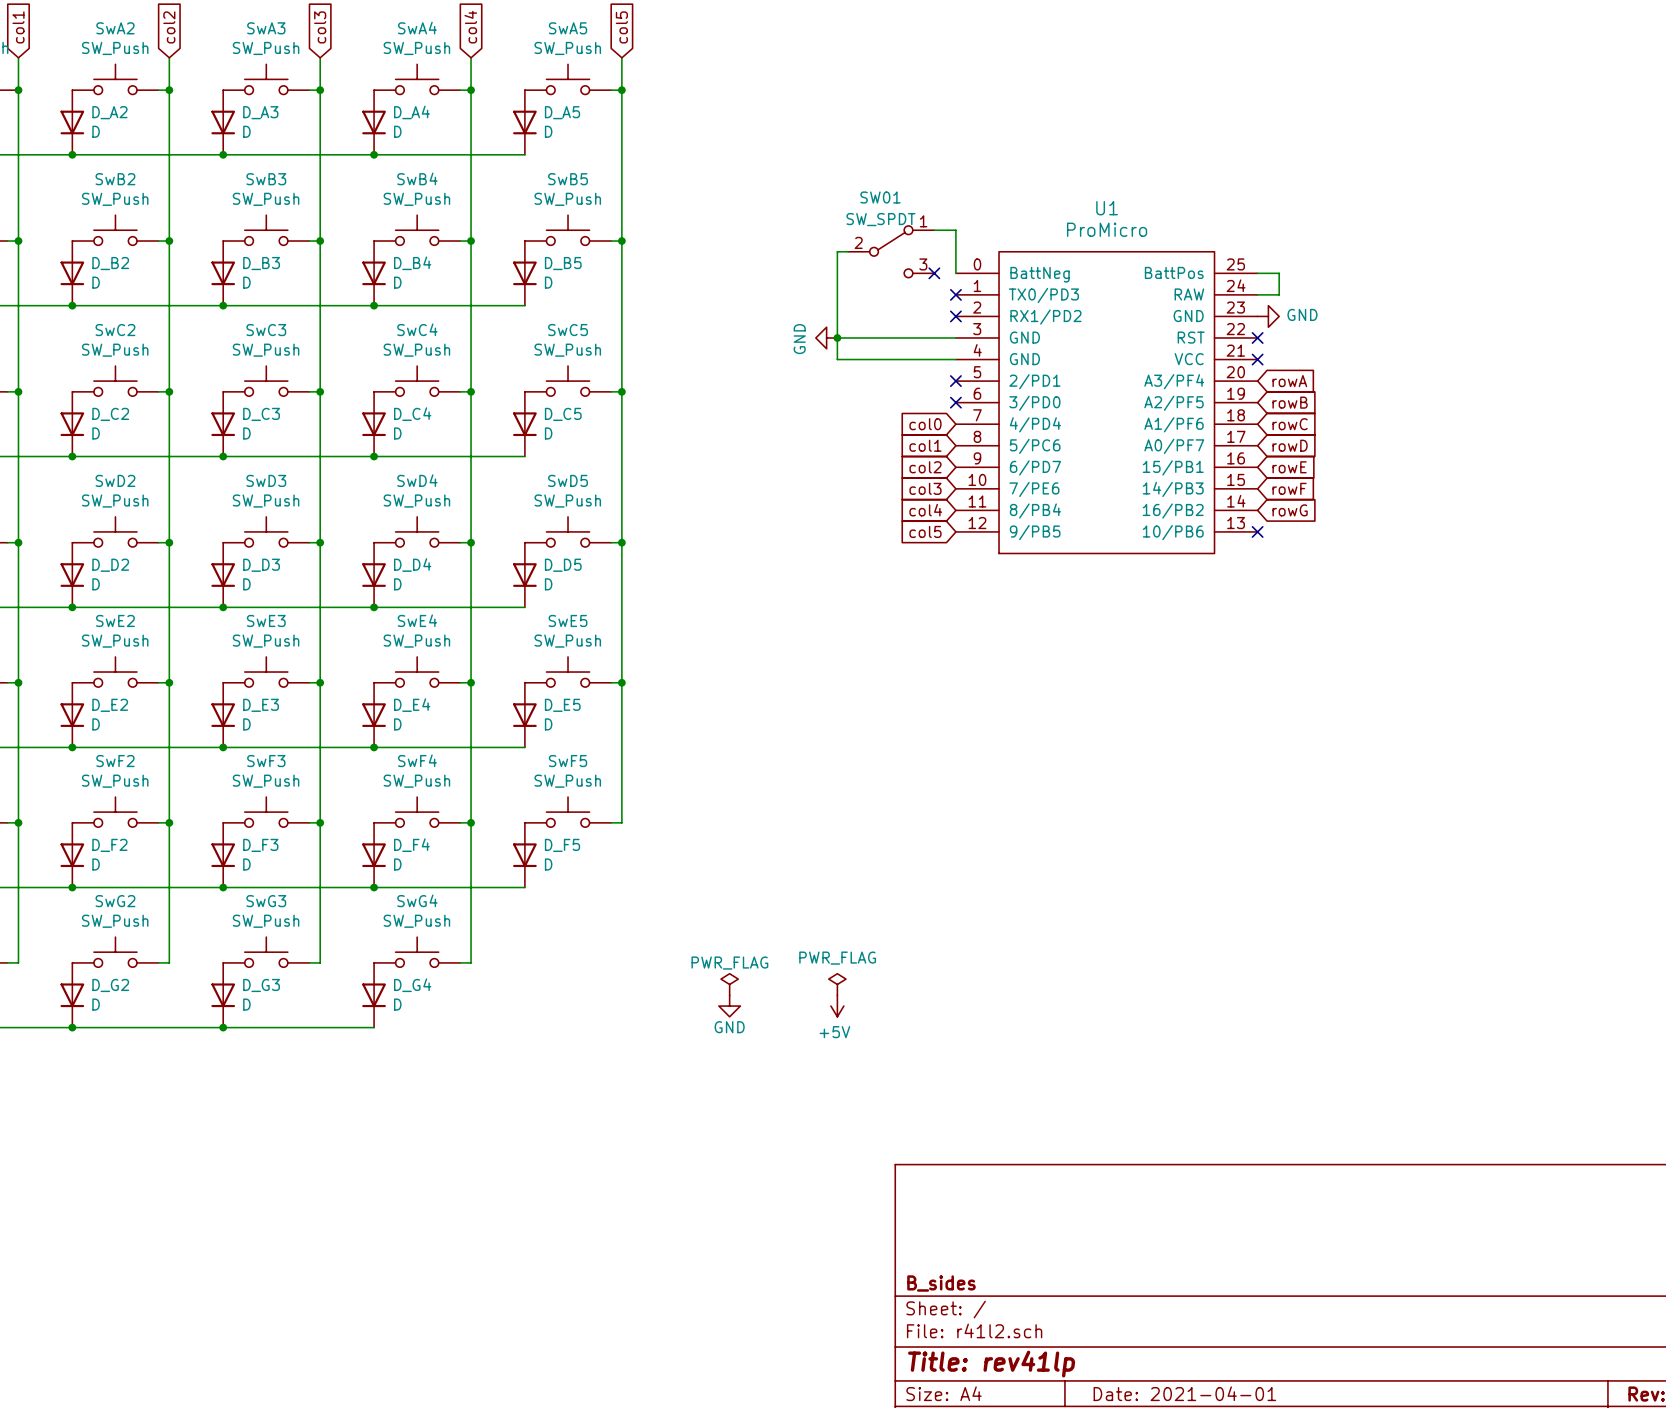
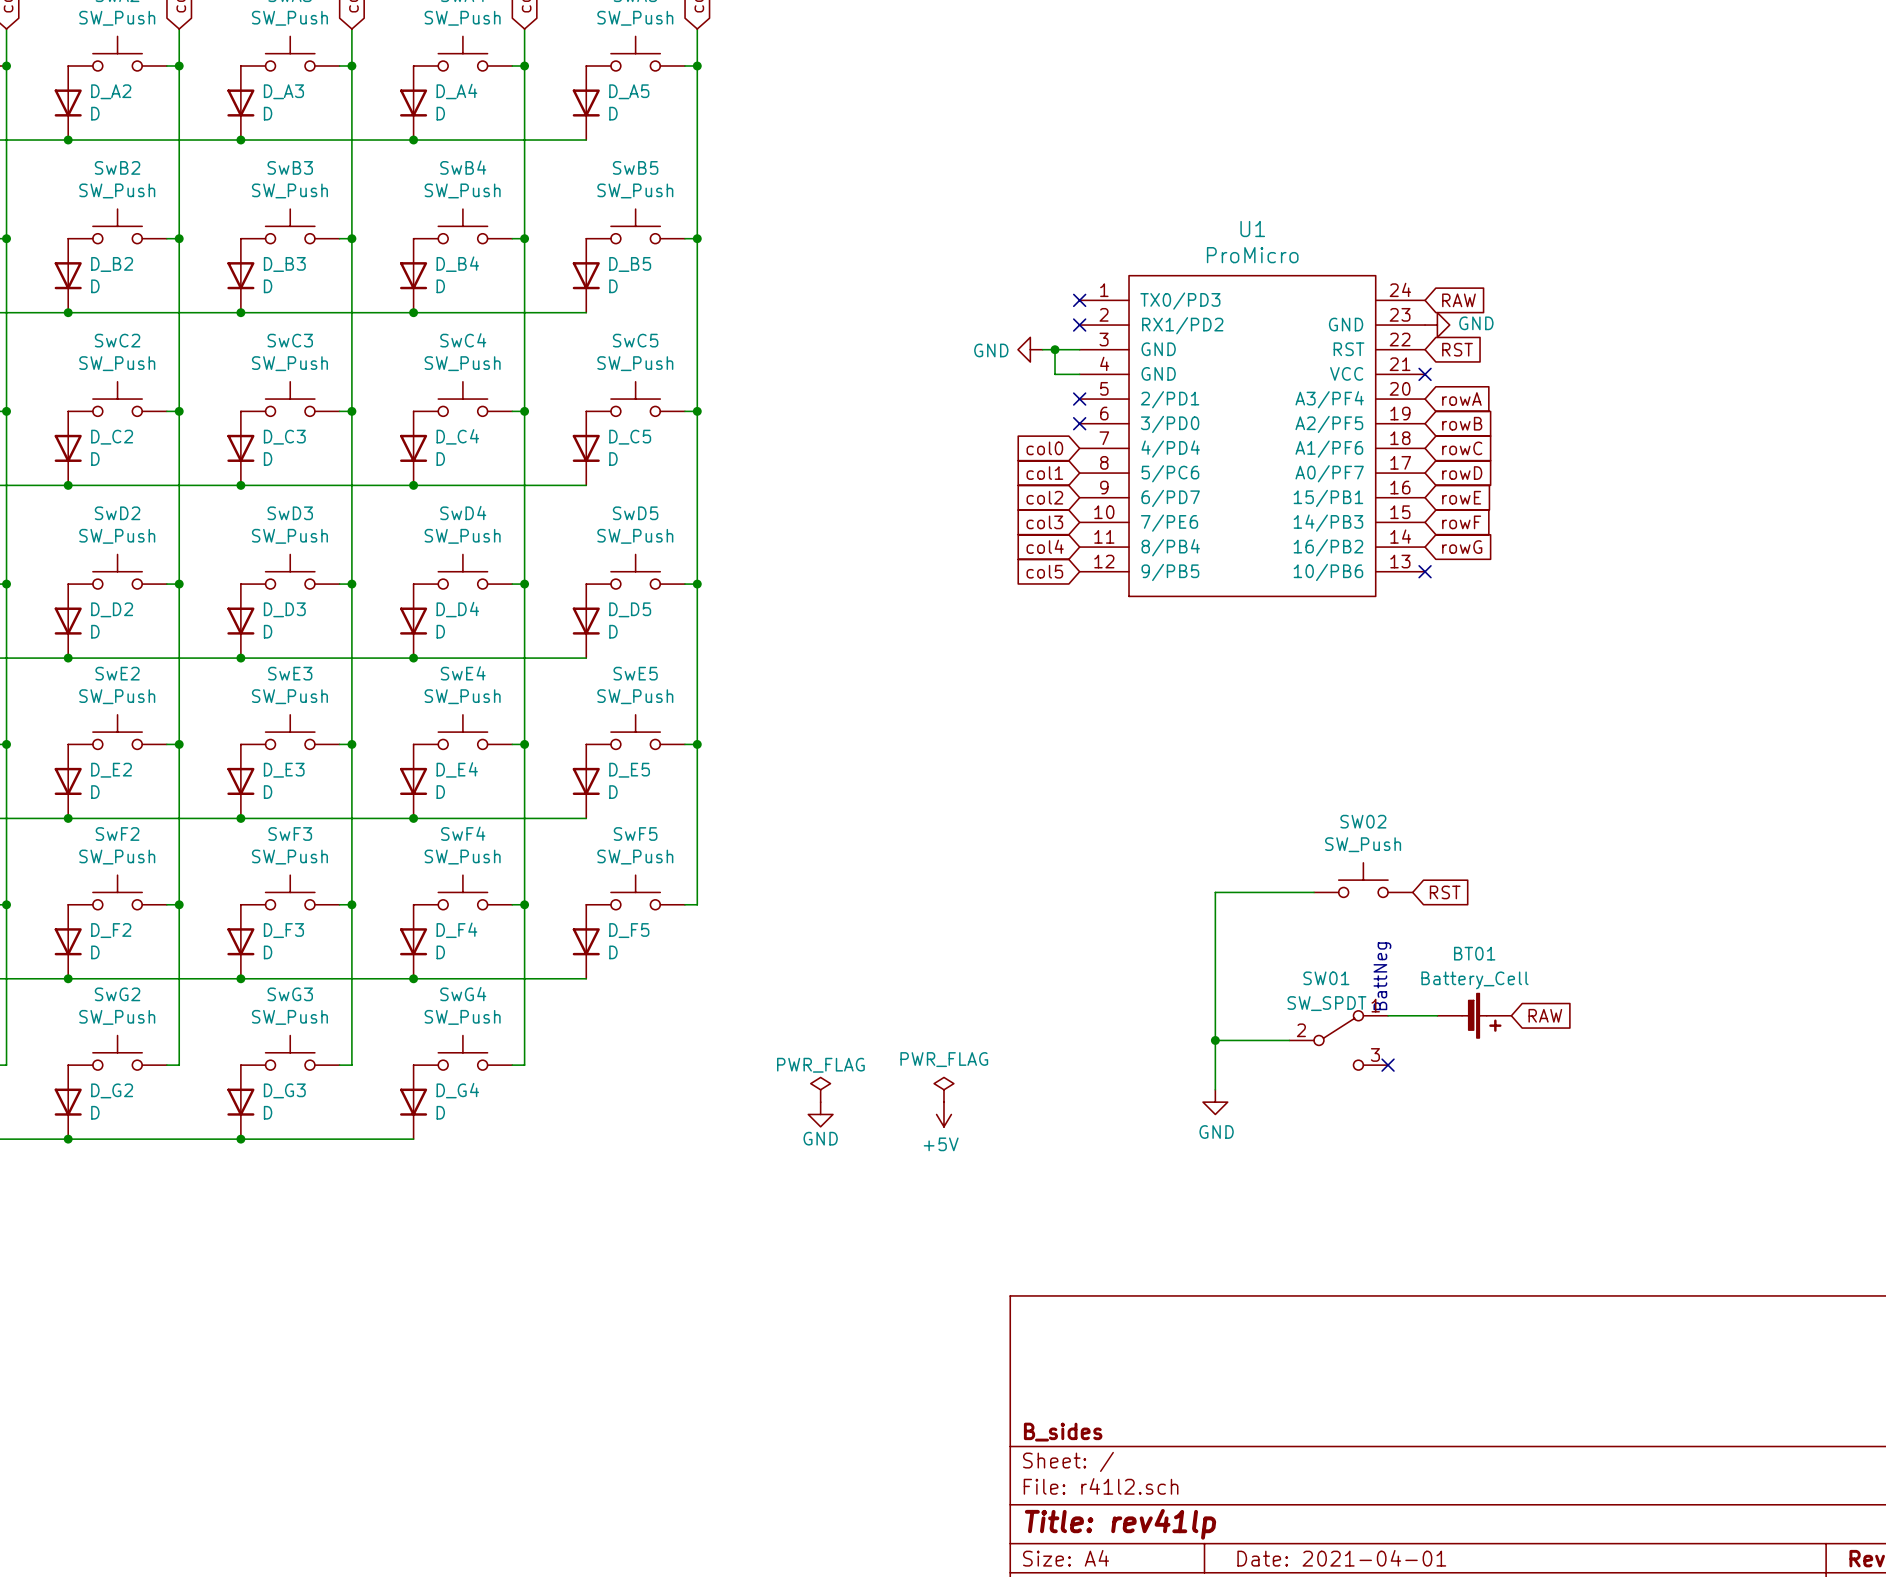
wire: (934, 230) (955, 230) (955, 273) -> none
wire: (848, 251) (837, 251) (837, 359) (934, 359) -> (1055, 349) (1055, 374)
SW01 position: (891, 251) -> (1338, 1040)
U1 symbol: [955, 251, 1258, 554] -> [1079, 275, 1426, 597]
no-connect mark: (934, 273) -> none
wire: (1257, 273) (1279, 273) (1279, 294) (1257, 294) -> none
global label: none -> RAW (1458, 300)
power symbol position: GND (826, 337) -> GND (1030, 349)
wire: (837, 337) (923, 337) -> none
junction: (837, 337) -> none
junction: none -> (1055, 349)
no-connect mark: (1257, 337) -> none
global label: none -> RST (1457, 349)
power symbol text rotation: 0° (799, 339) -> 90° clockwise (991, 350)
SW02: none -> SW_Push (1363, 880)
wire: none -> (1314, 892) (1215, 892) (1215, 1089)
global label: none -> RST (1445, 892)
text: none -> BattNeg (1382, 976)
wire: none -> (1388, 1015) (1437, 1015)
BT01: none -> Battery_Cell (1474, 1015)
global label: none -> RAW (1545, 1015)
wire: none -> (1215, 1040) (1289, 1040)
junction: none -> (1215, 1040)
no-connect mark: none -> (1388, 1065)
power symbol: none -> GND (1215, 1102)

